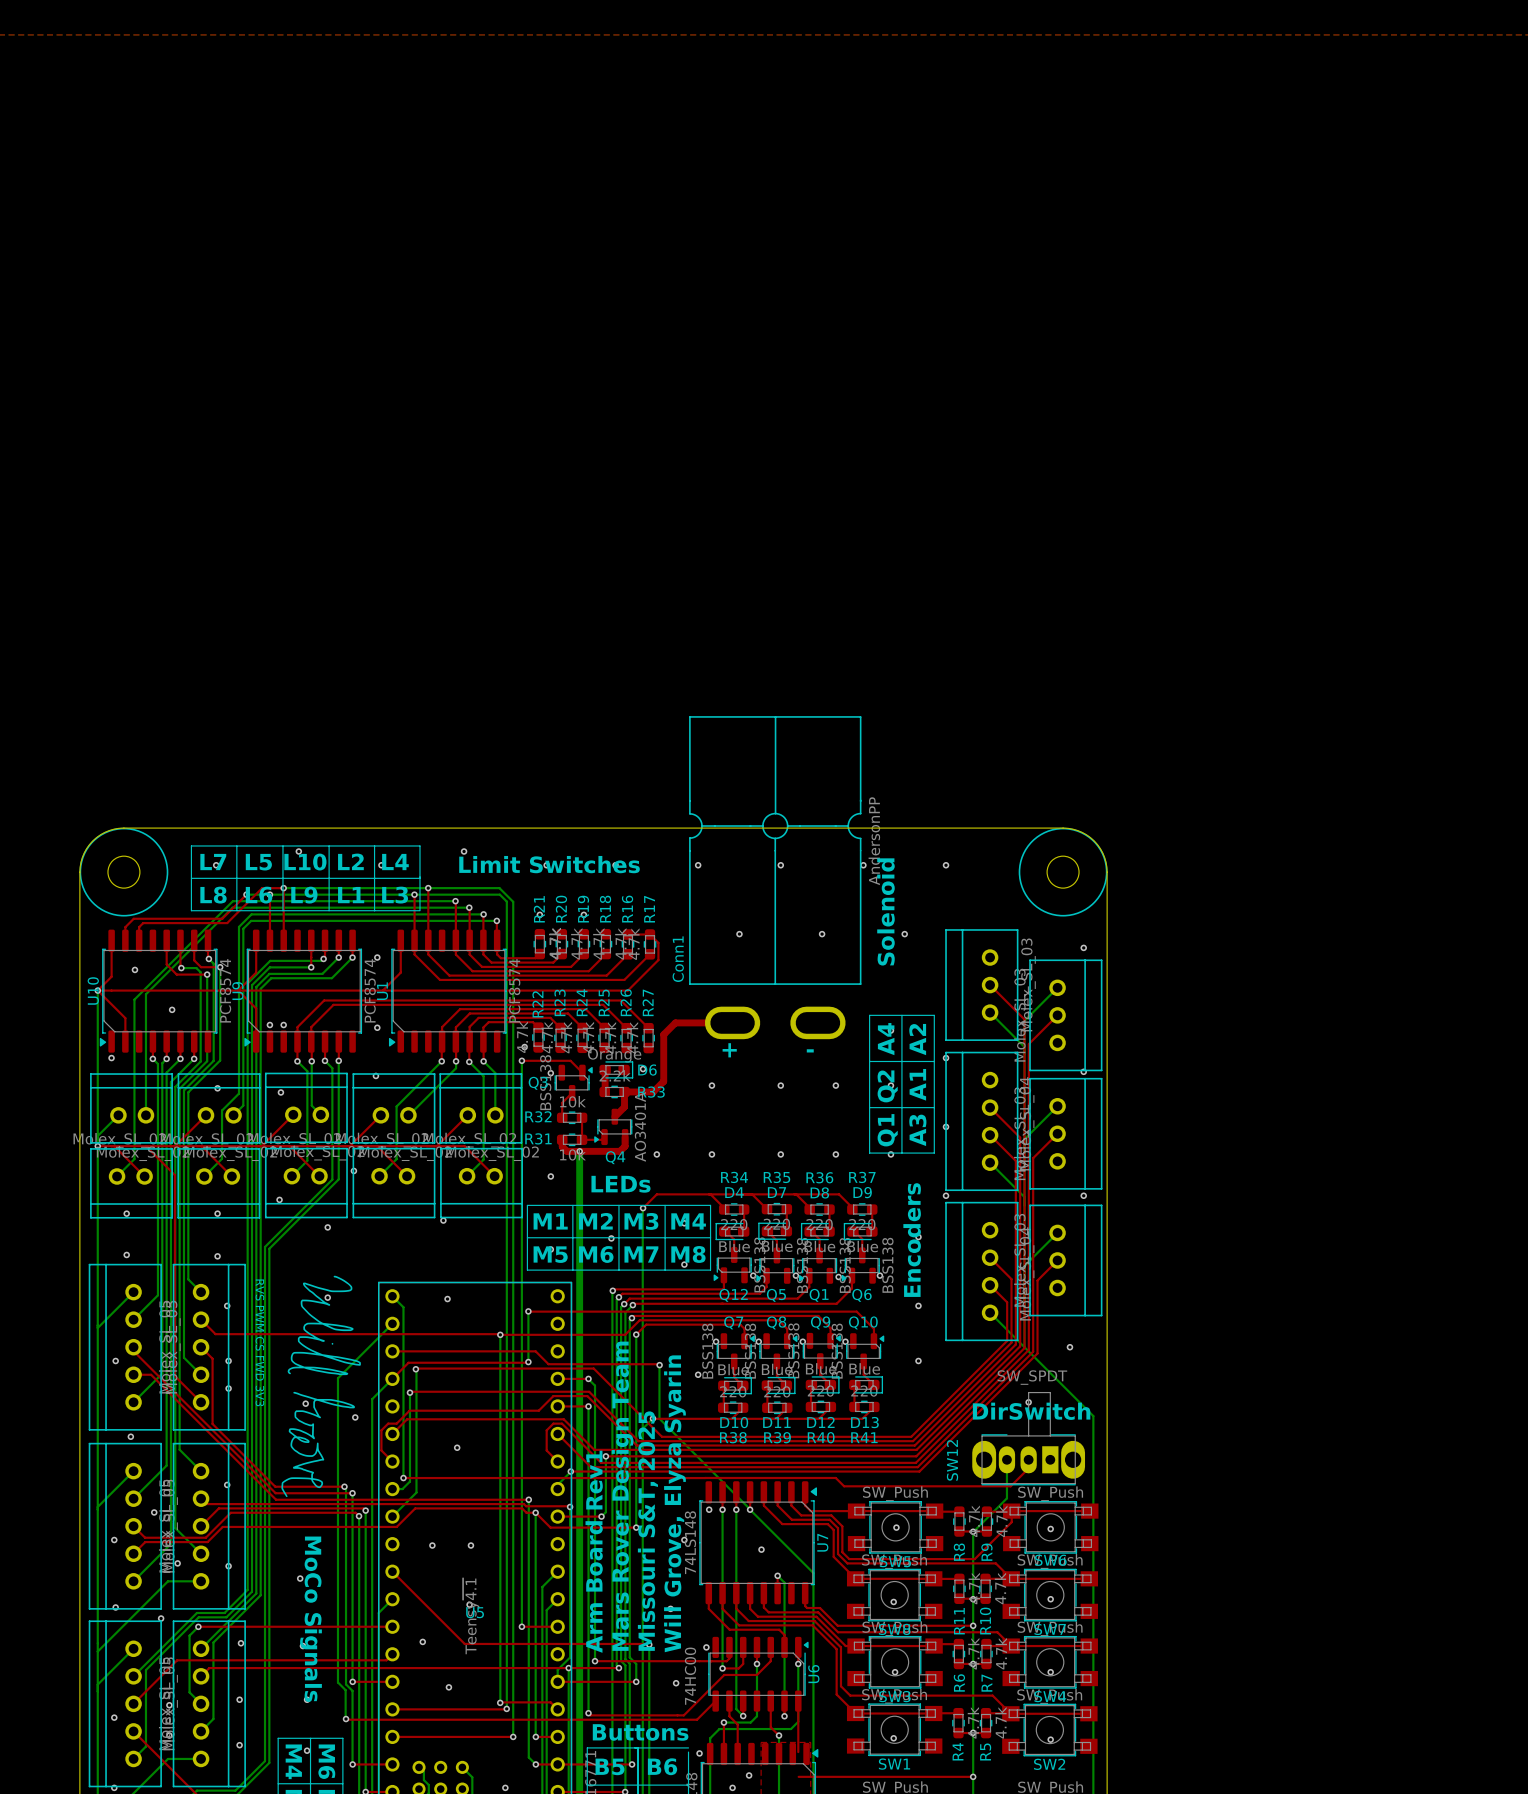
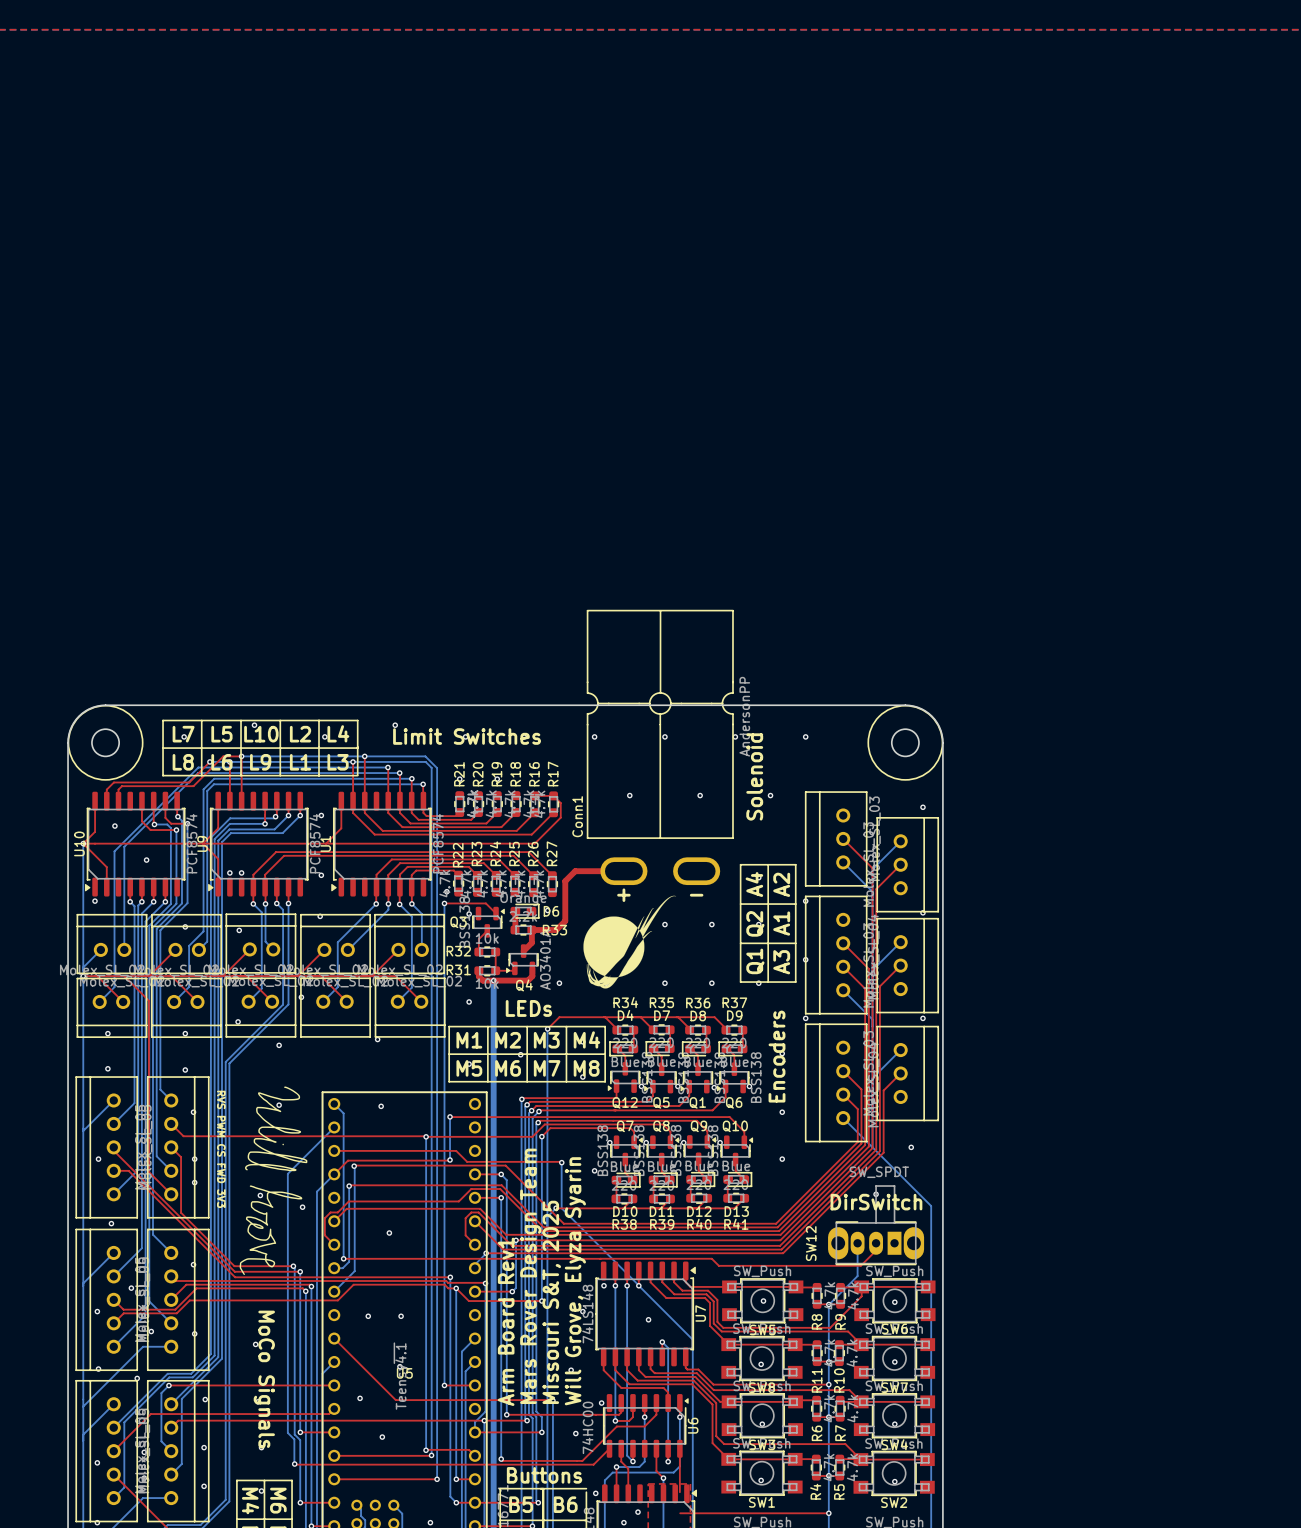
drawing: none -> [583, 895, 677, 989]

